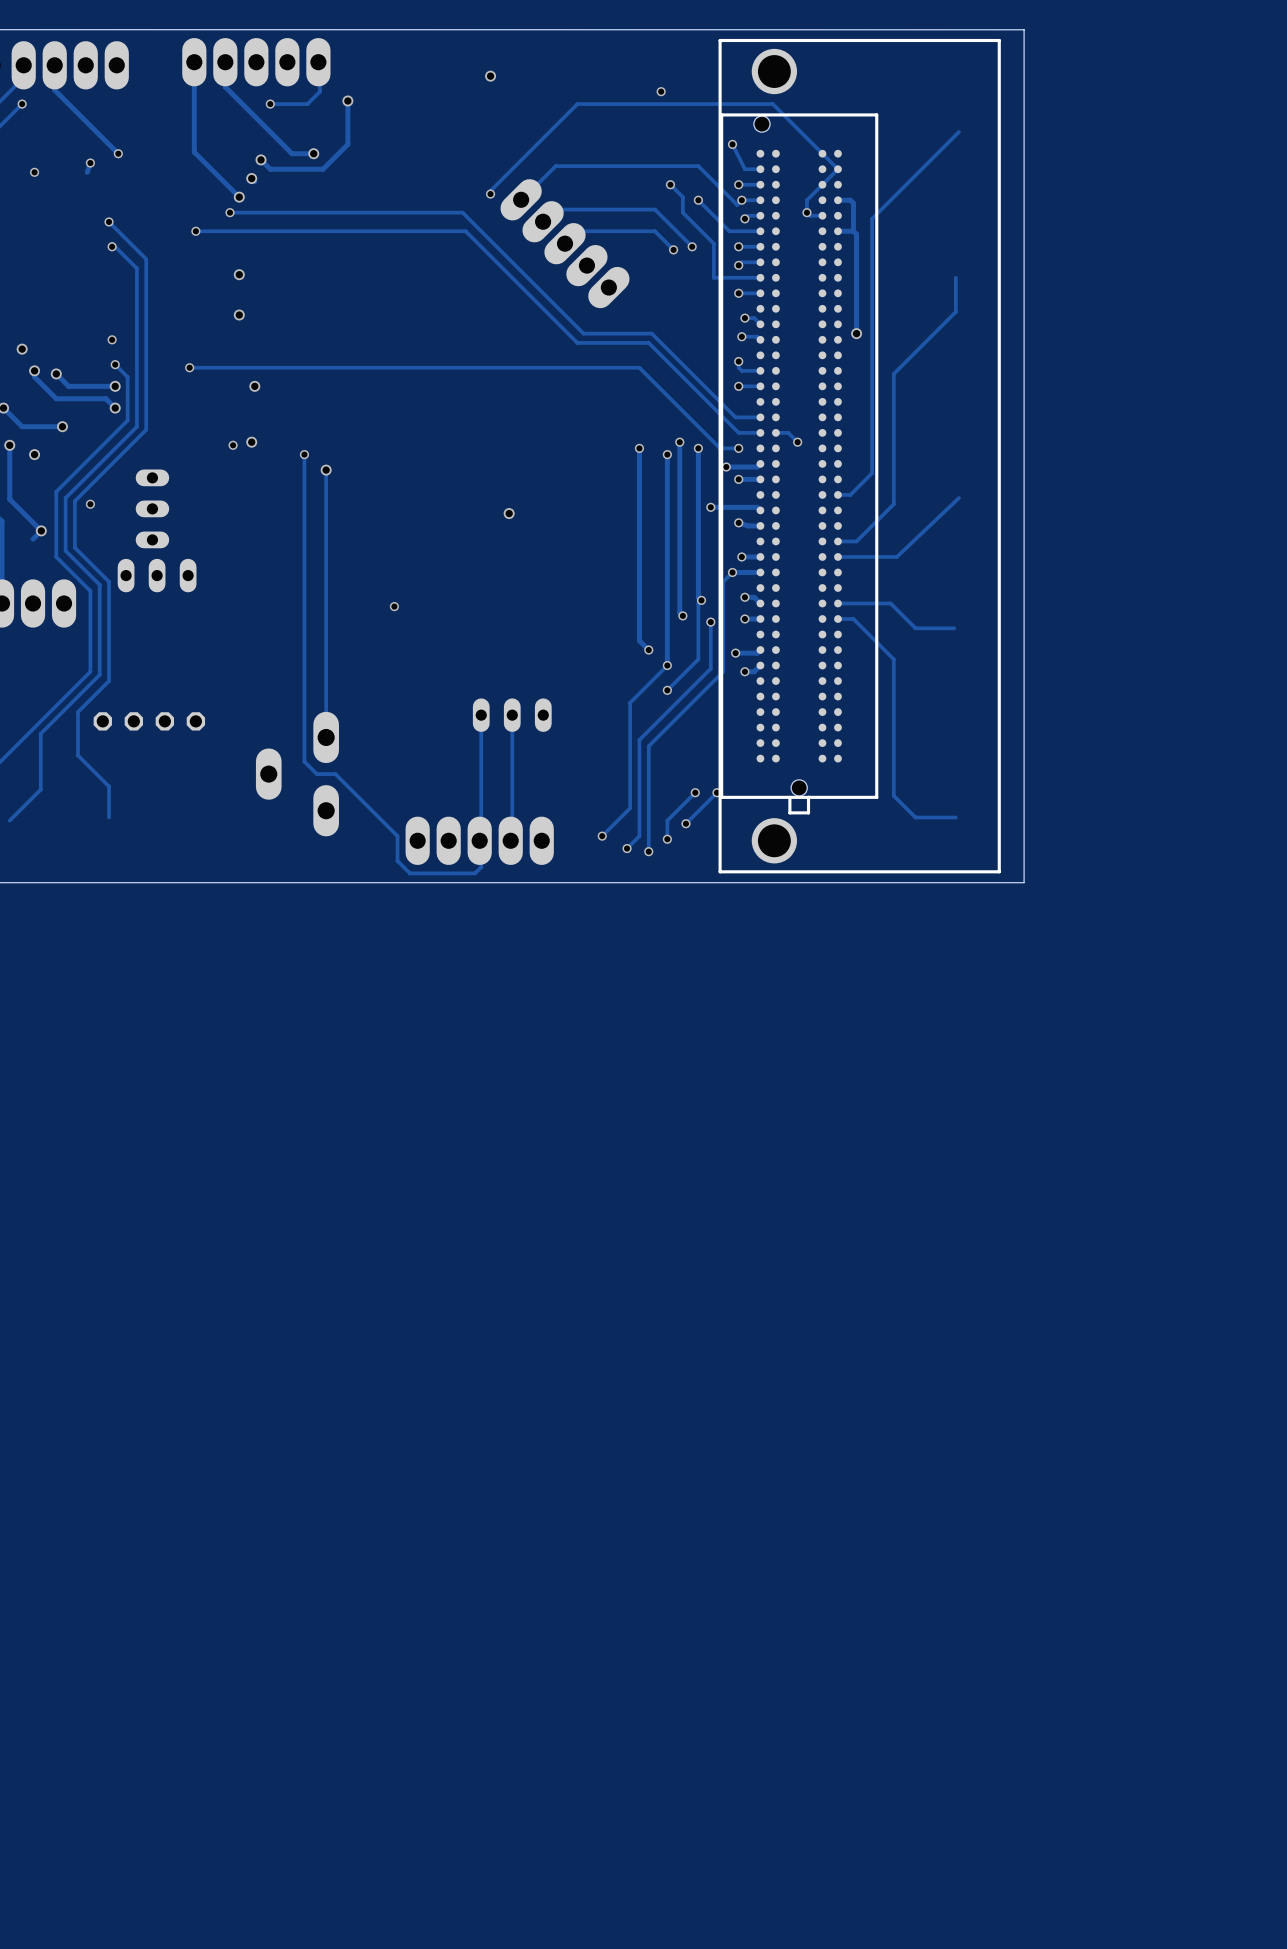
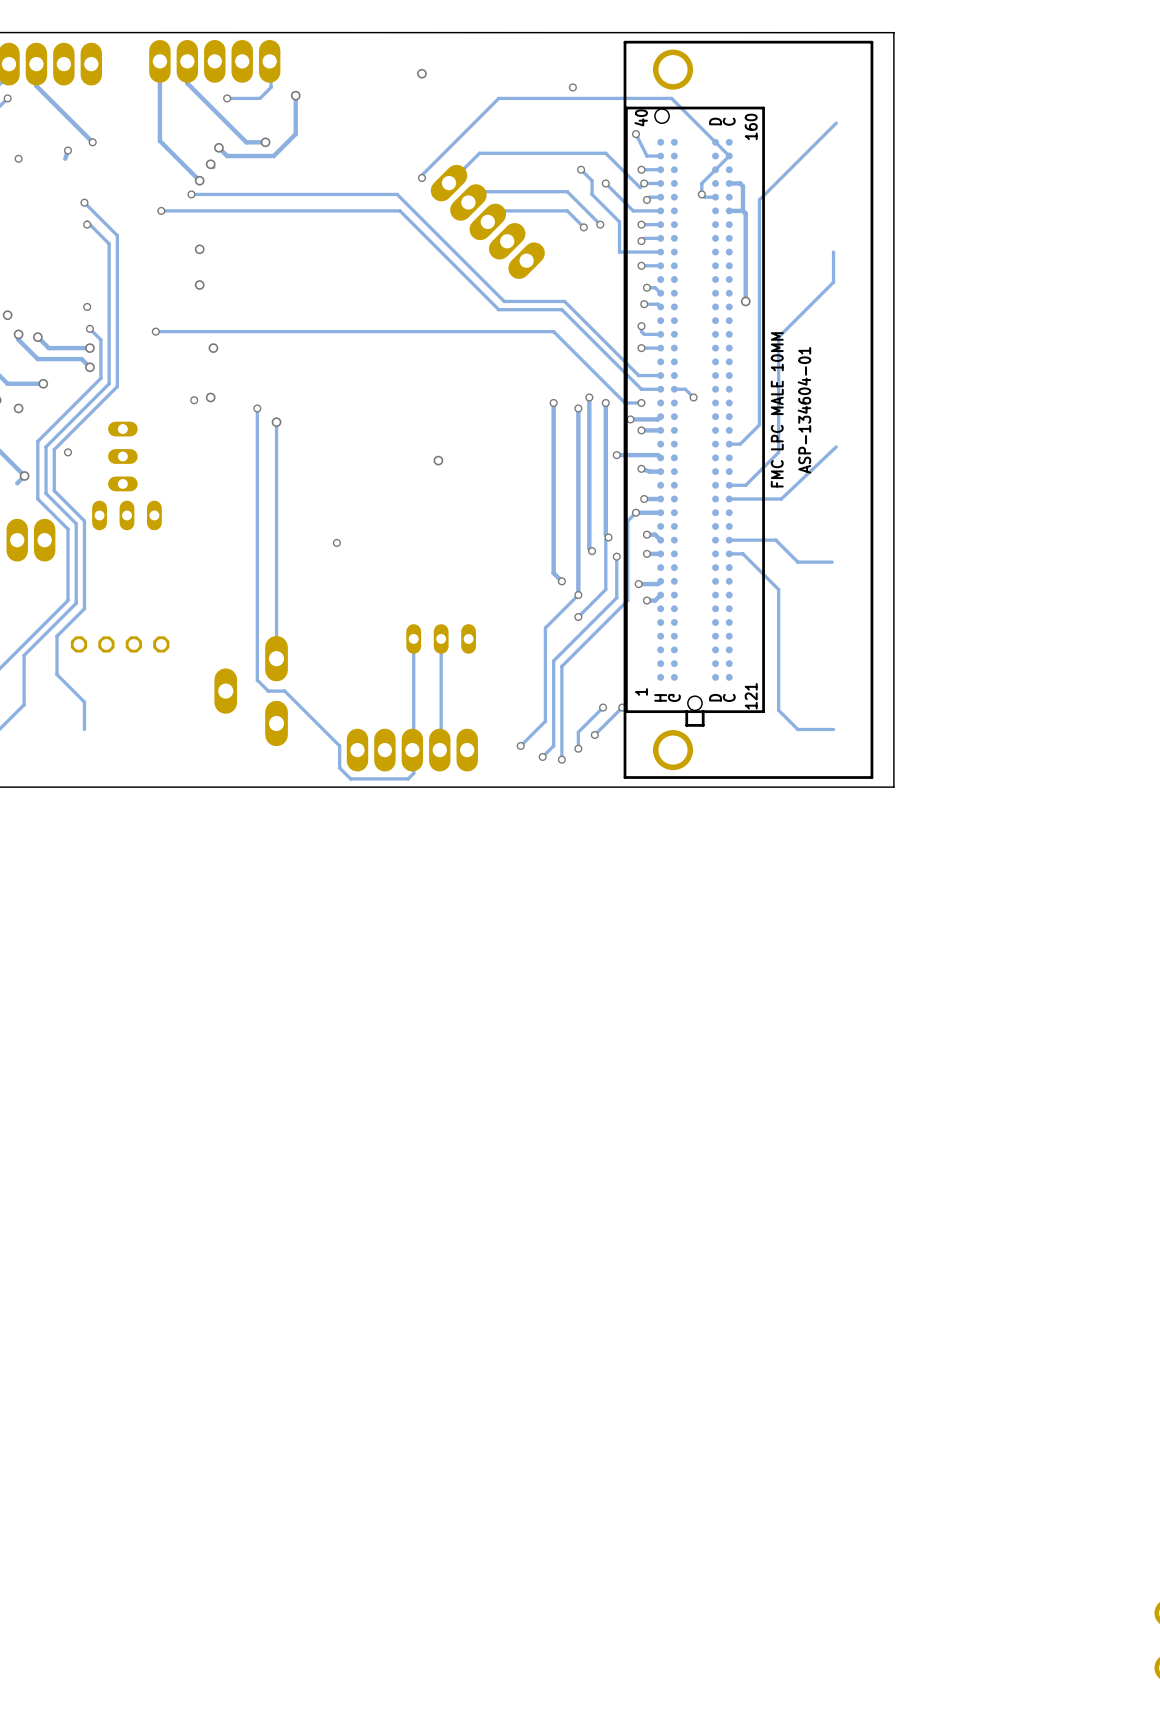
part footprint: [718, 38, 1001, 874] -> [623, 40, 874, 779]

